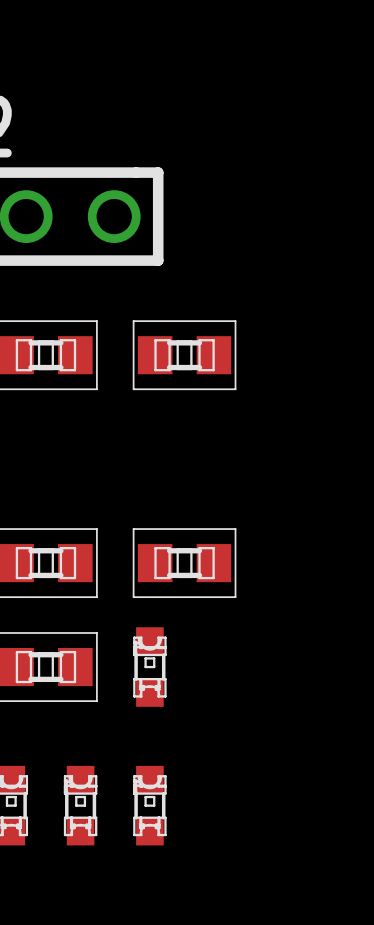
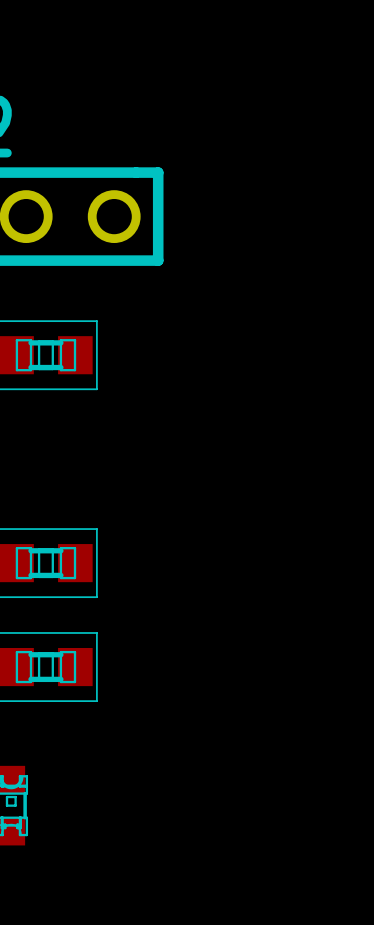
part: (184, 355) -> none
part: (184, 563) -> none
part: (149, 667) -> none
part: (80, 805) -> none
part: (149, 805) -> none

